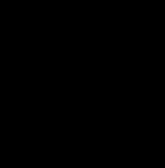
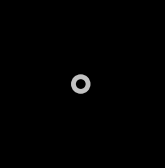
via: none -> (80, 84)

